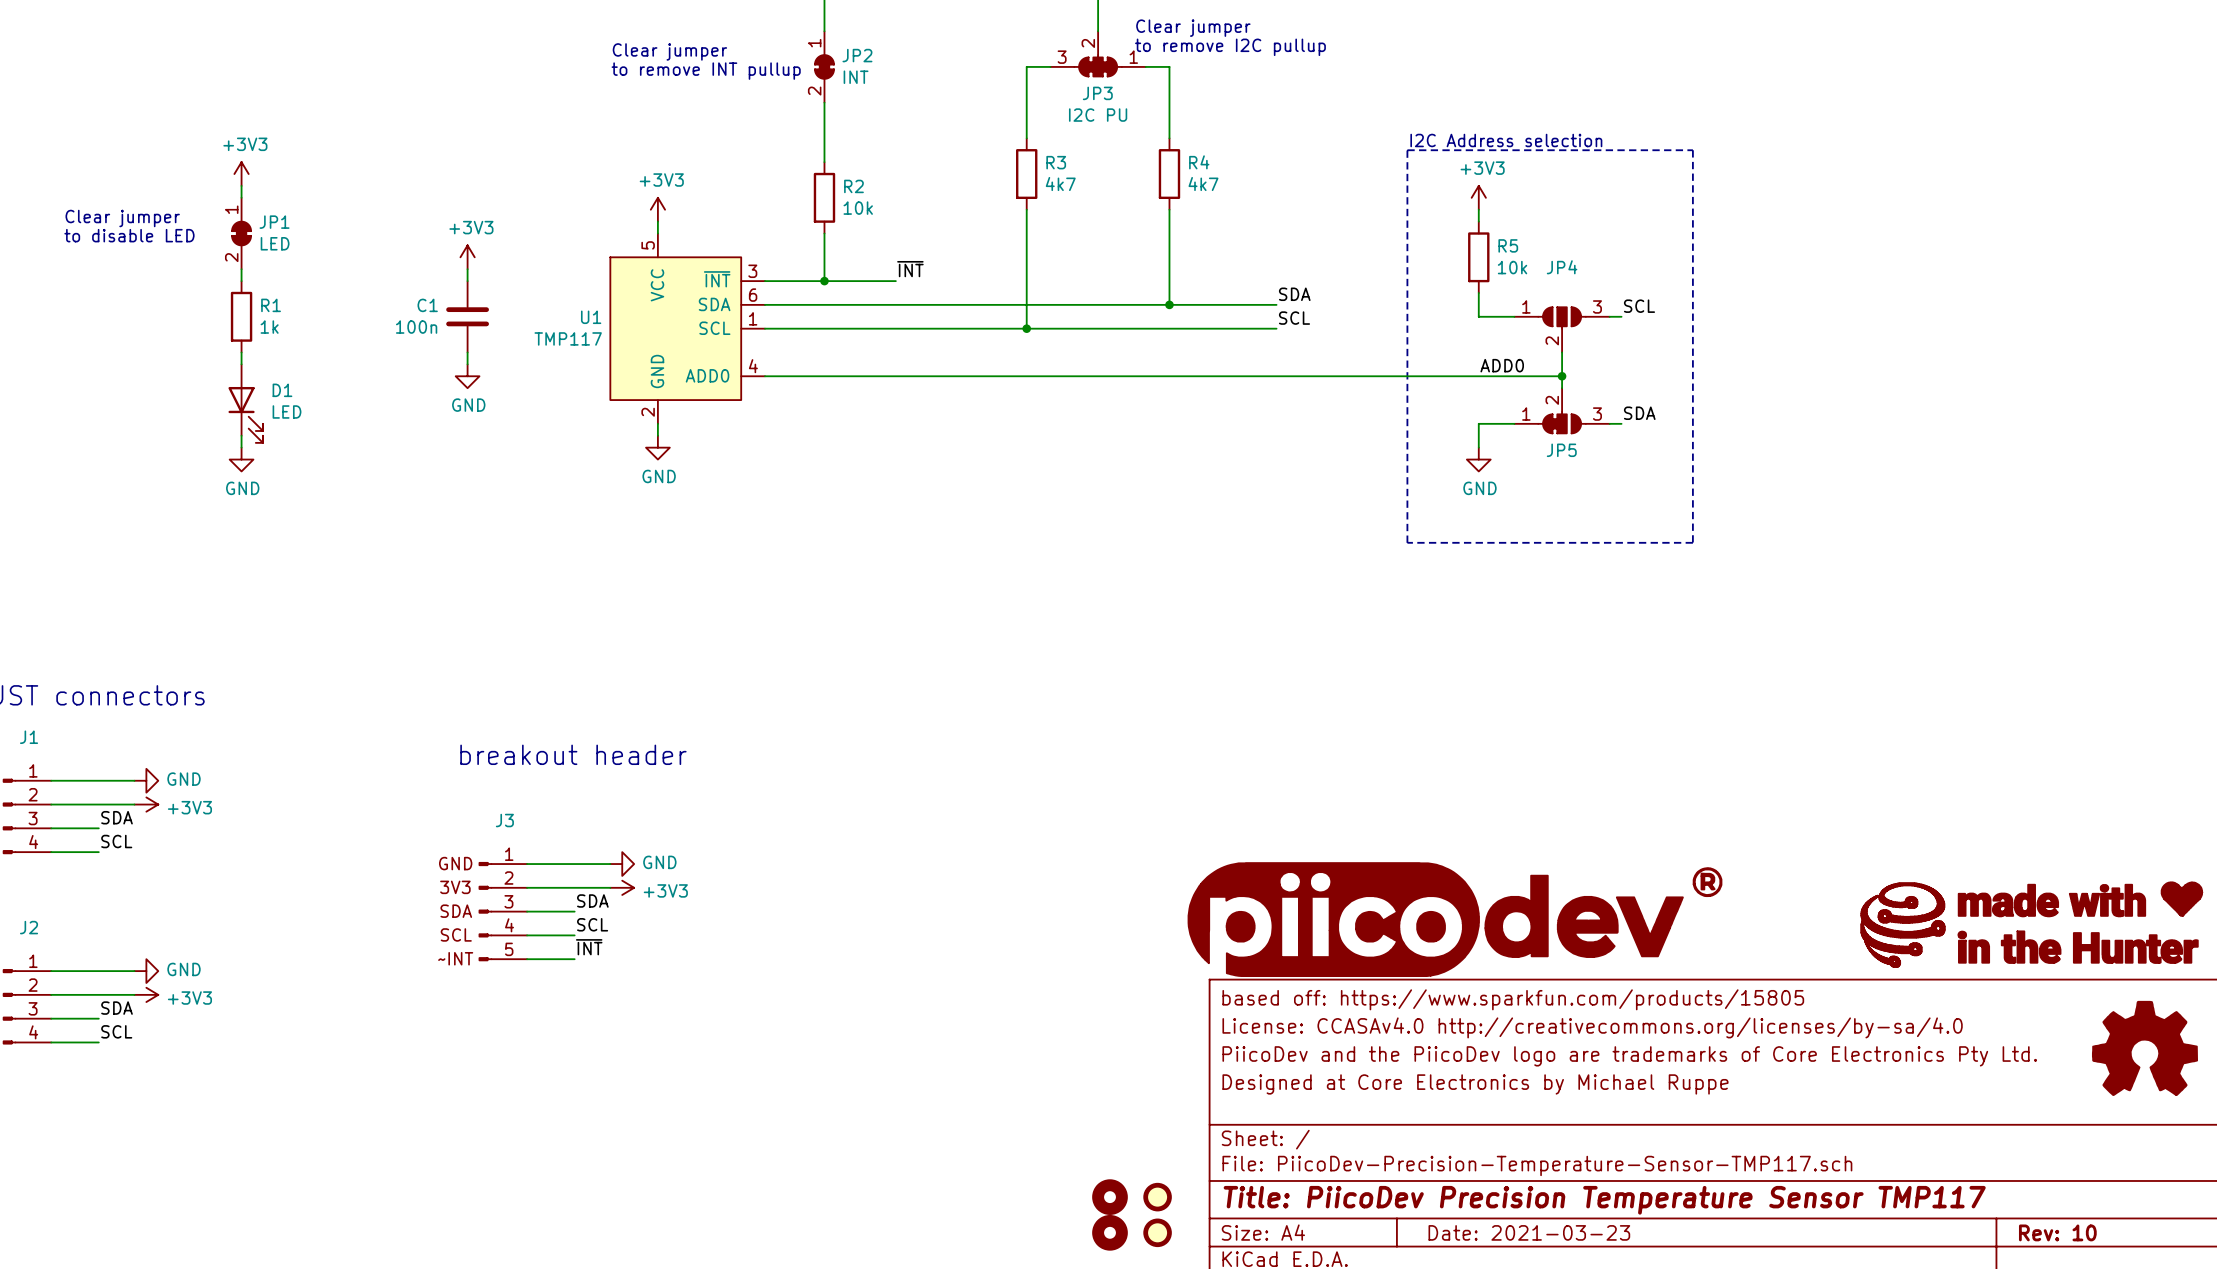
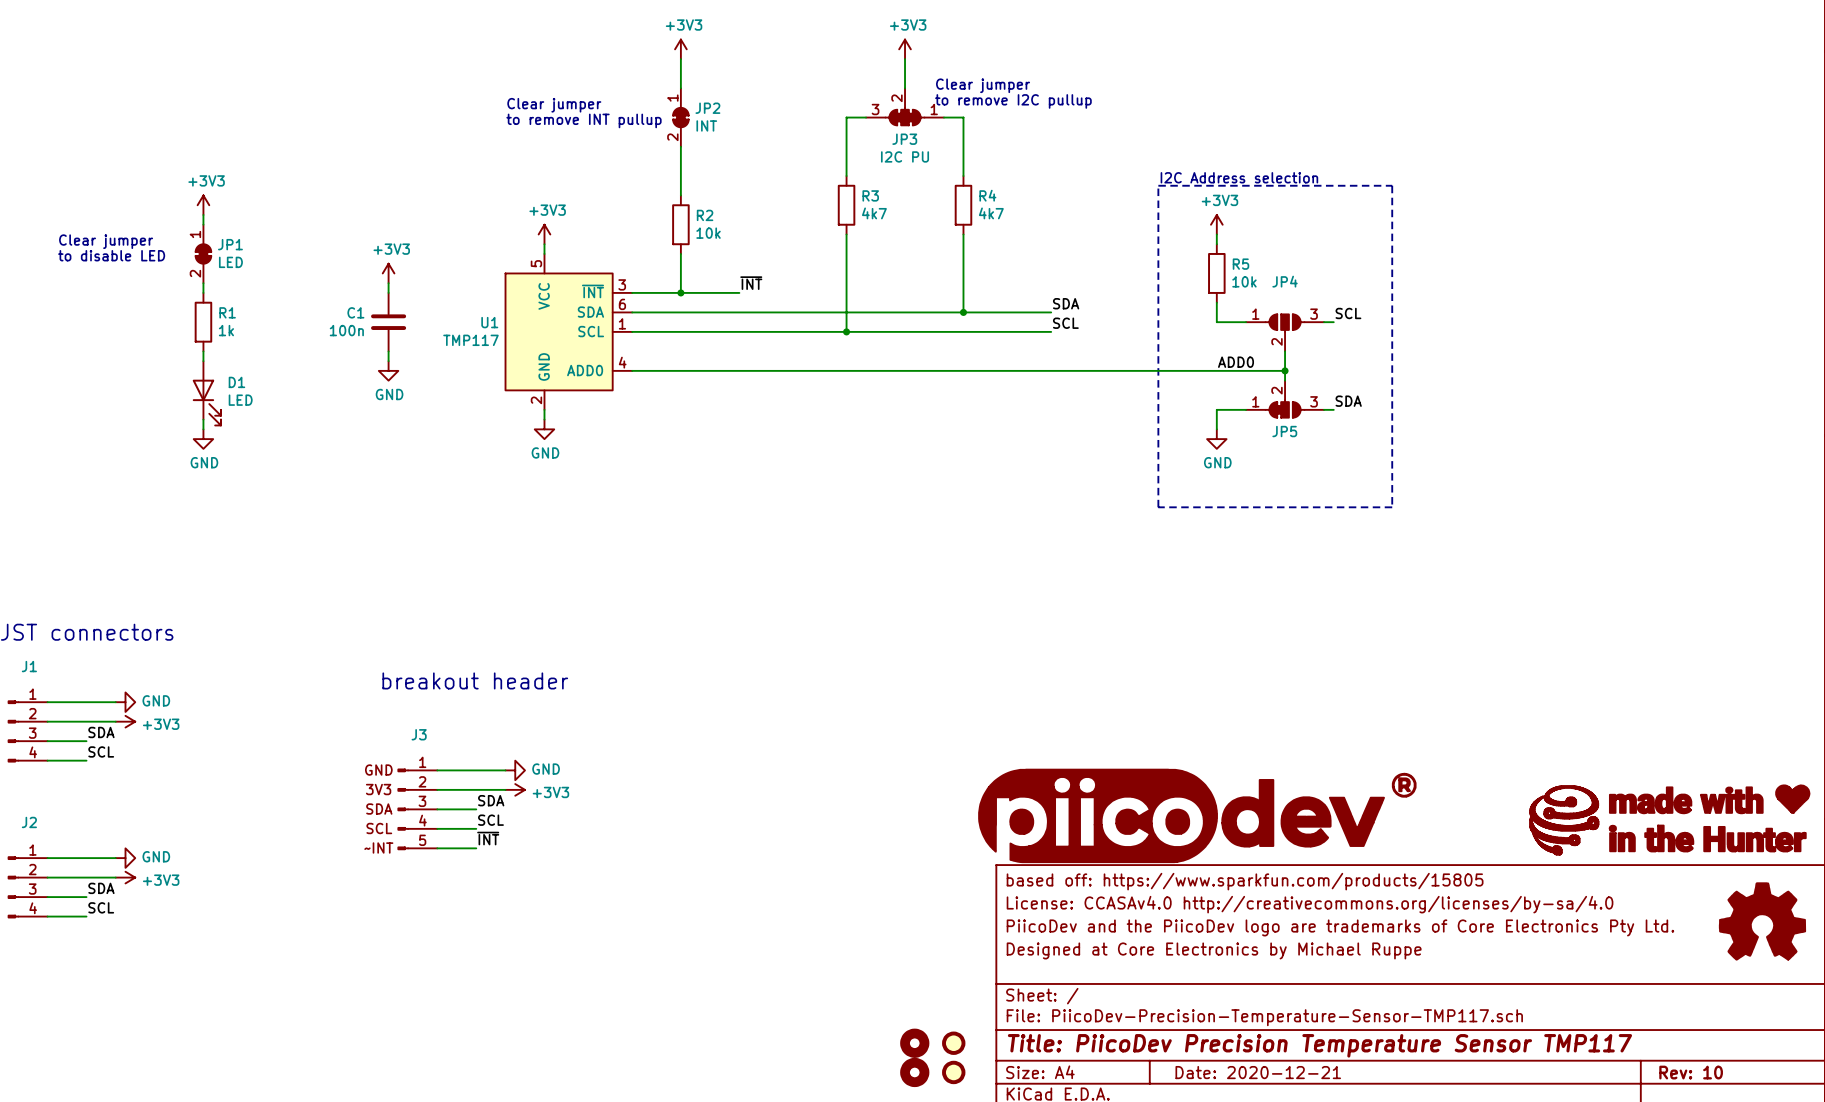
title block: Date: 2021-03-23 (1529, 1232) -> Date: 2020-12-21 (1258, 1072)

